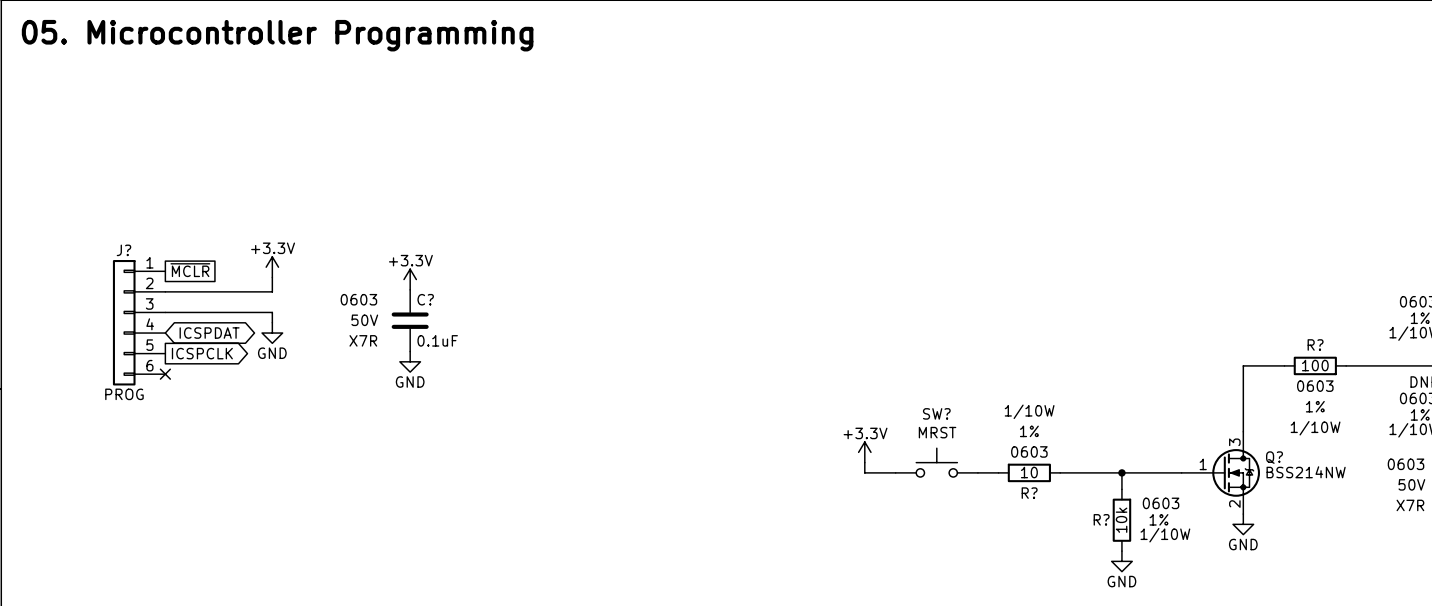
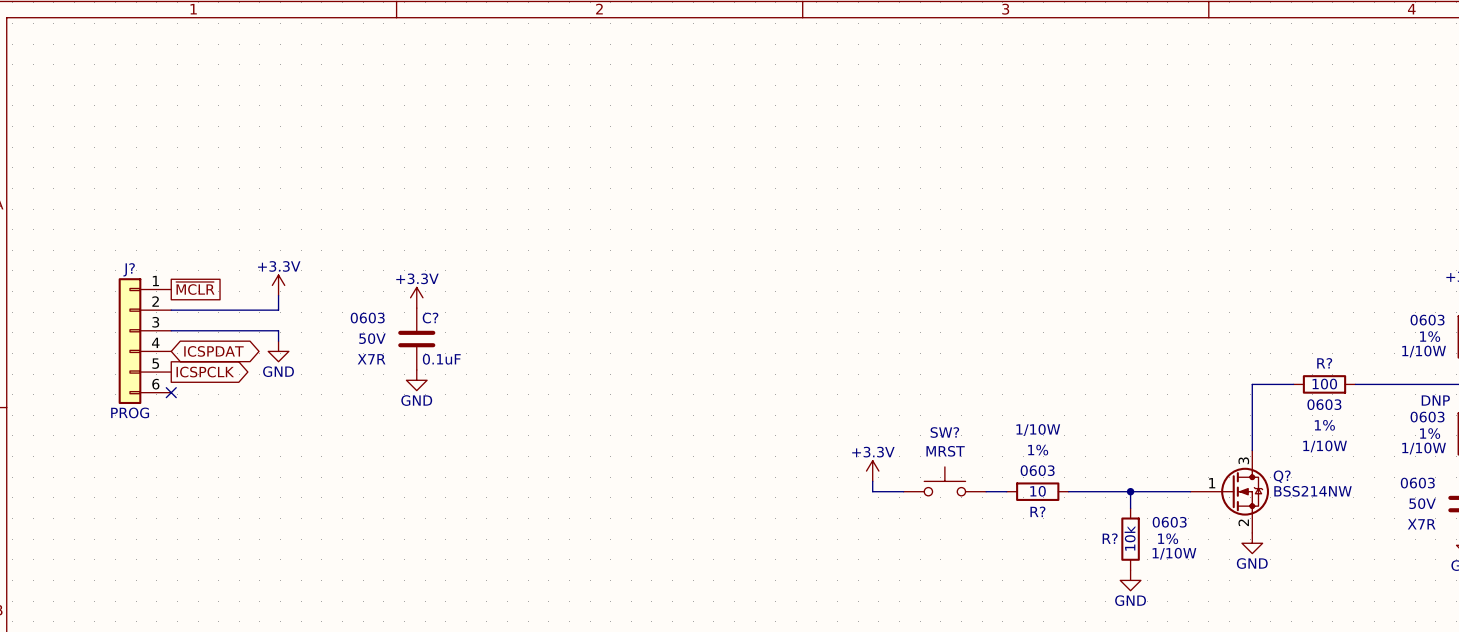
text: 05. Microcontroller Programming (277, 35) -> none

